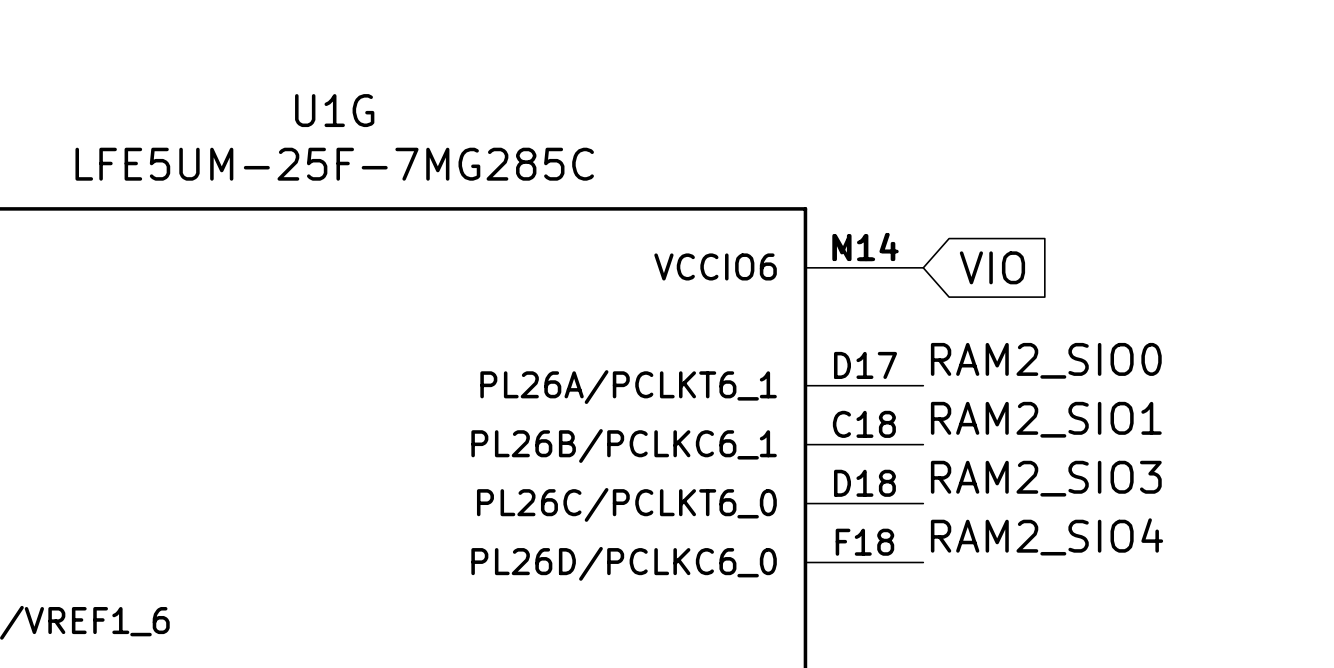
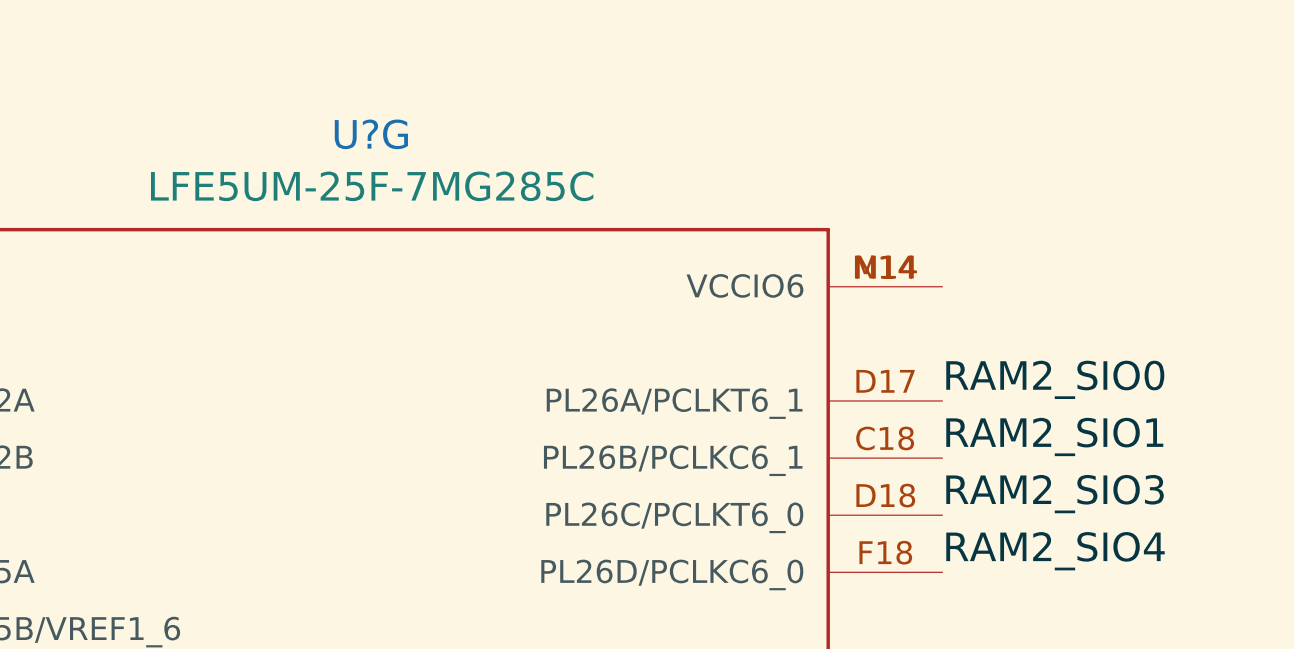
U1G name: U1G (334, 110) -> U?G (371, 134)
global label: VIO (992, 267) -> none

